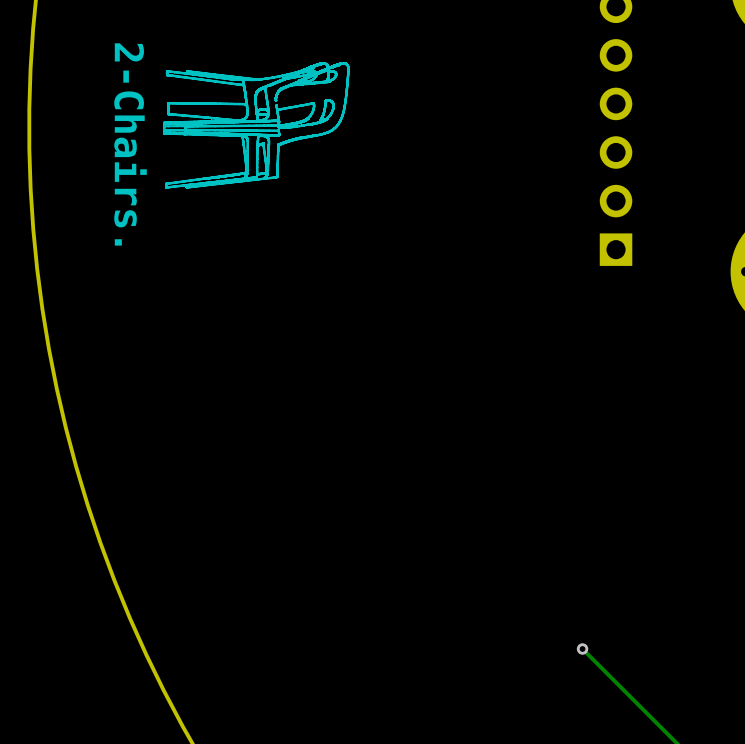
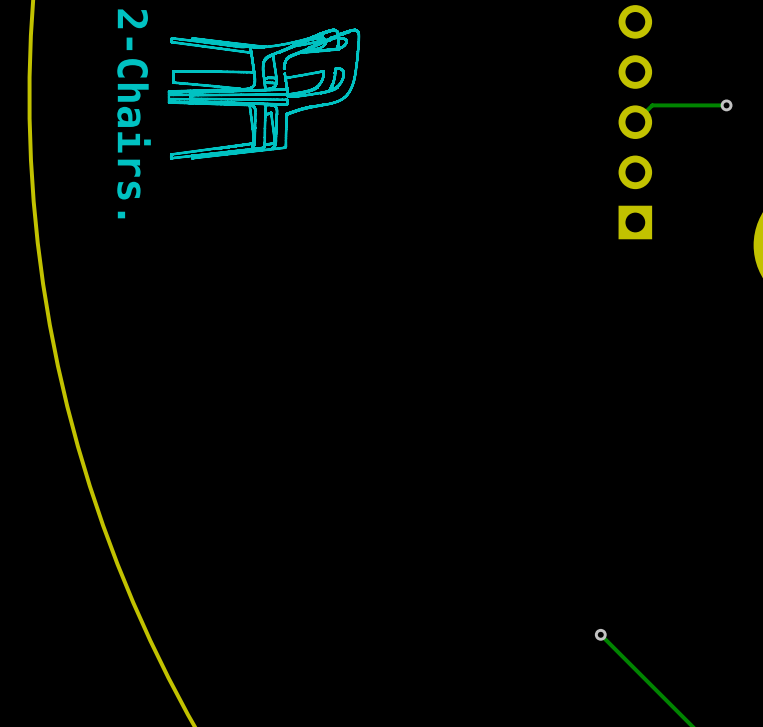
track: none -> (726, 105) (652, 105) (635, 122)
via: none -> (726, 105)

